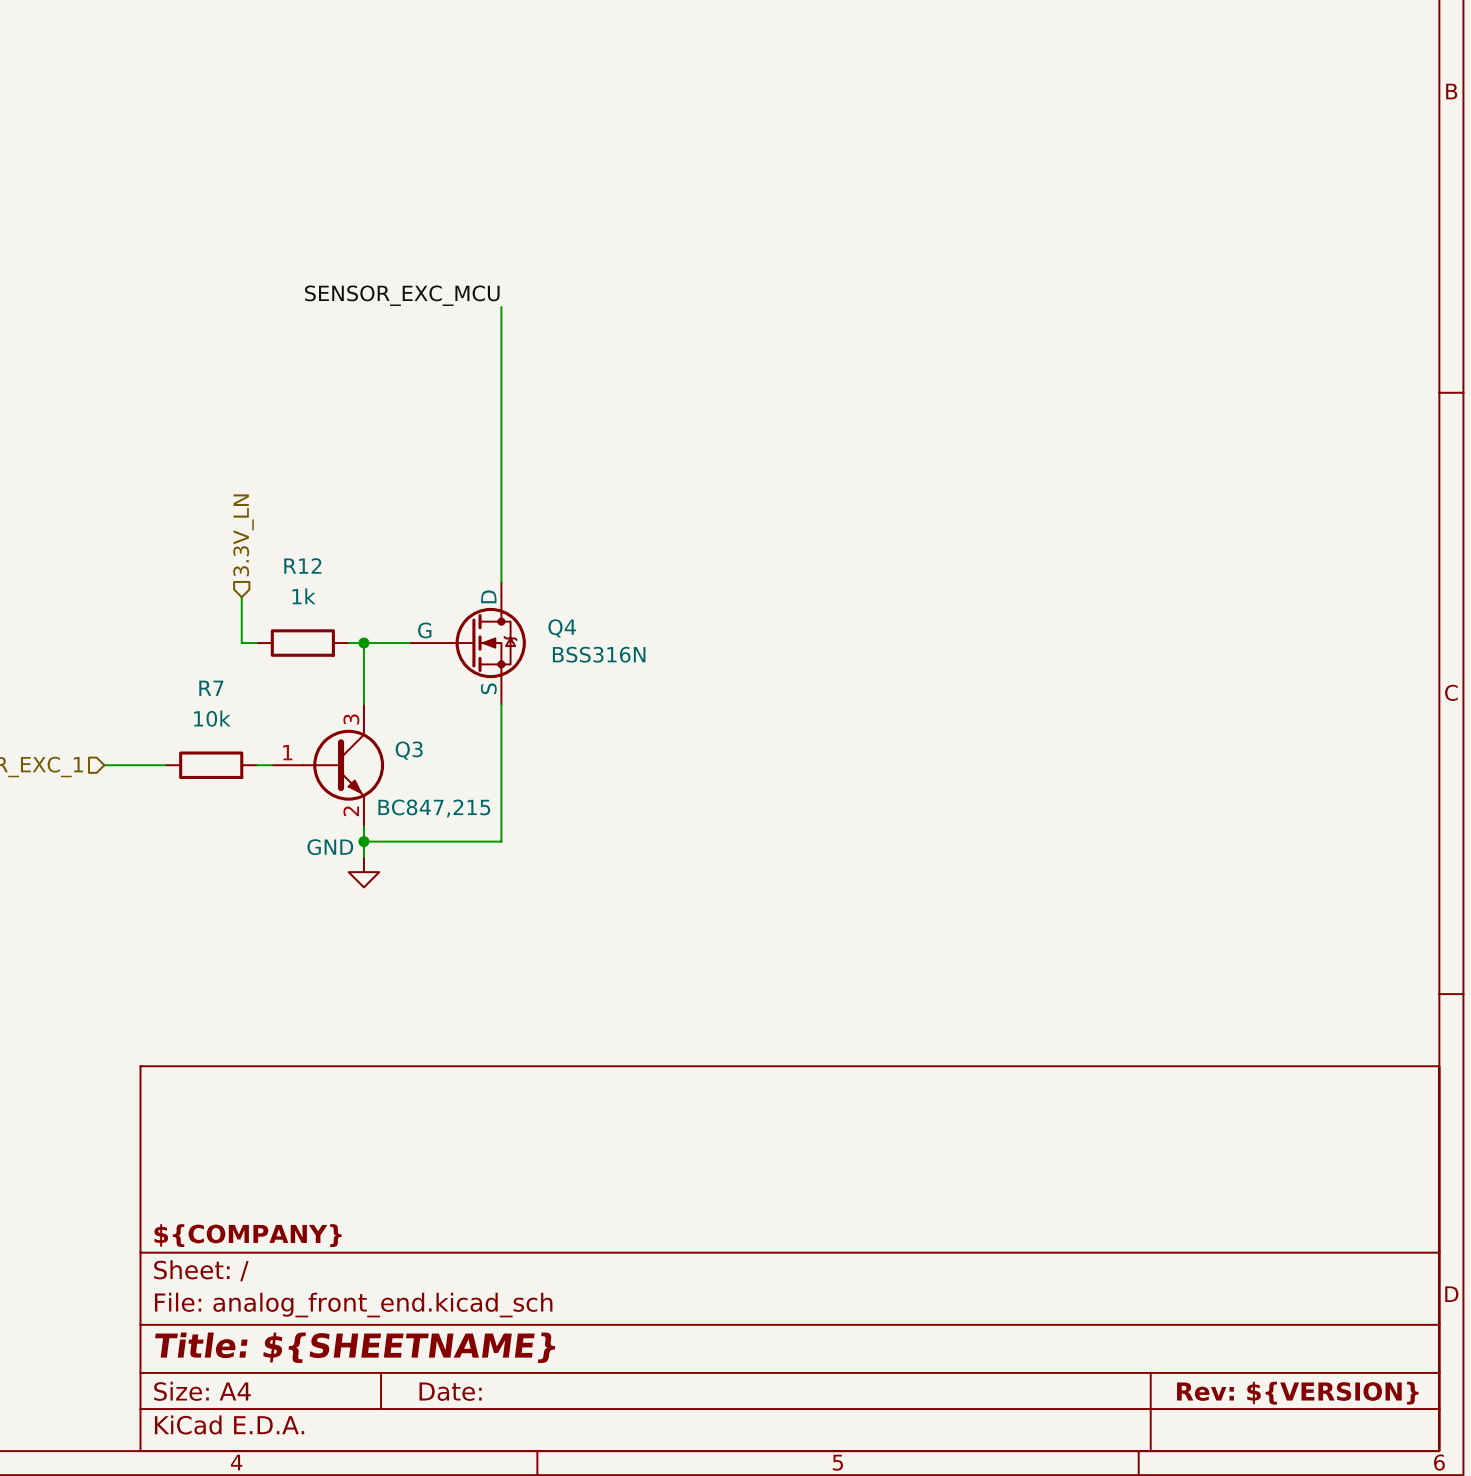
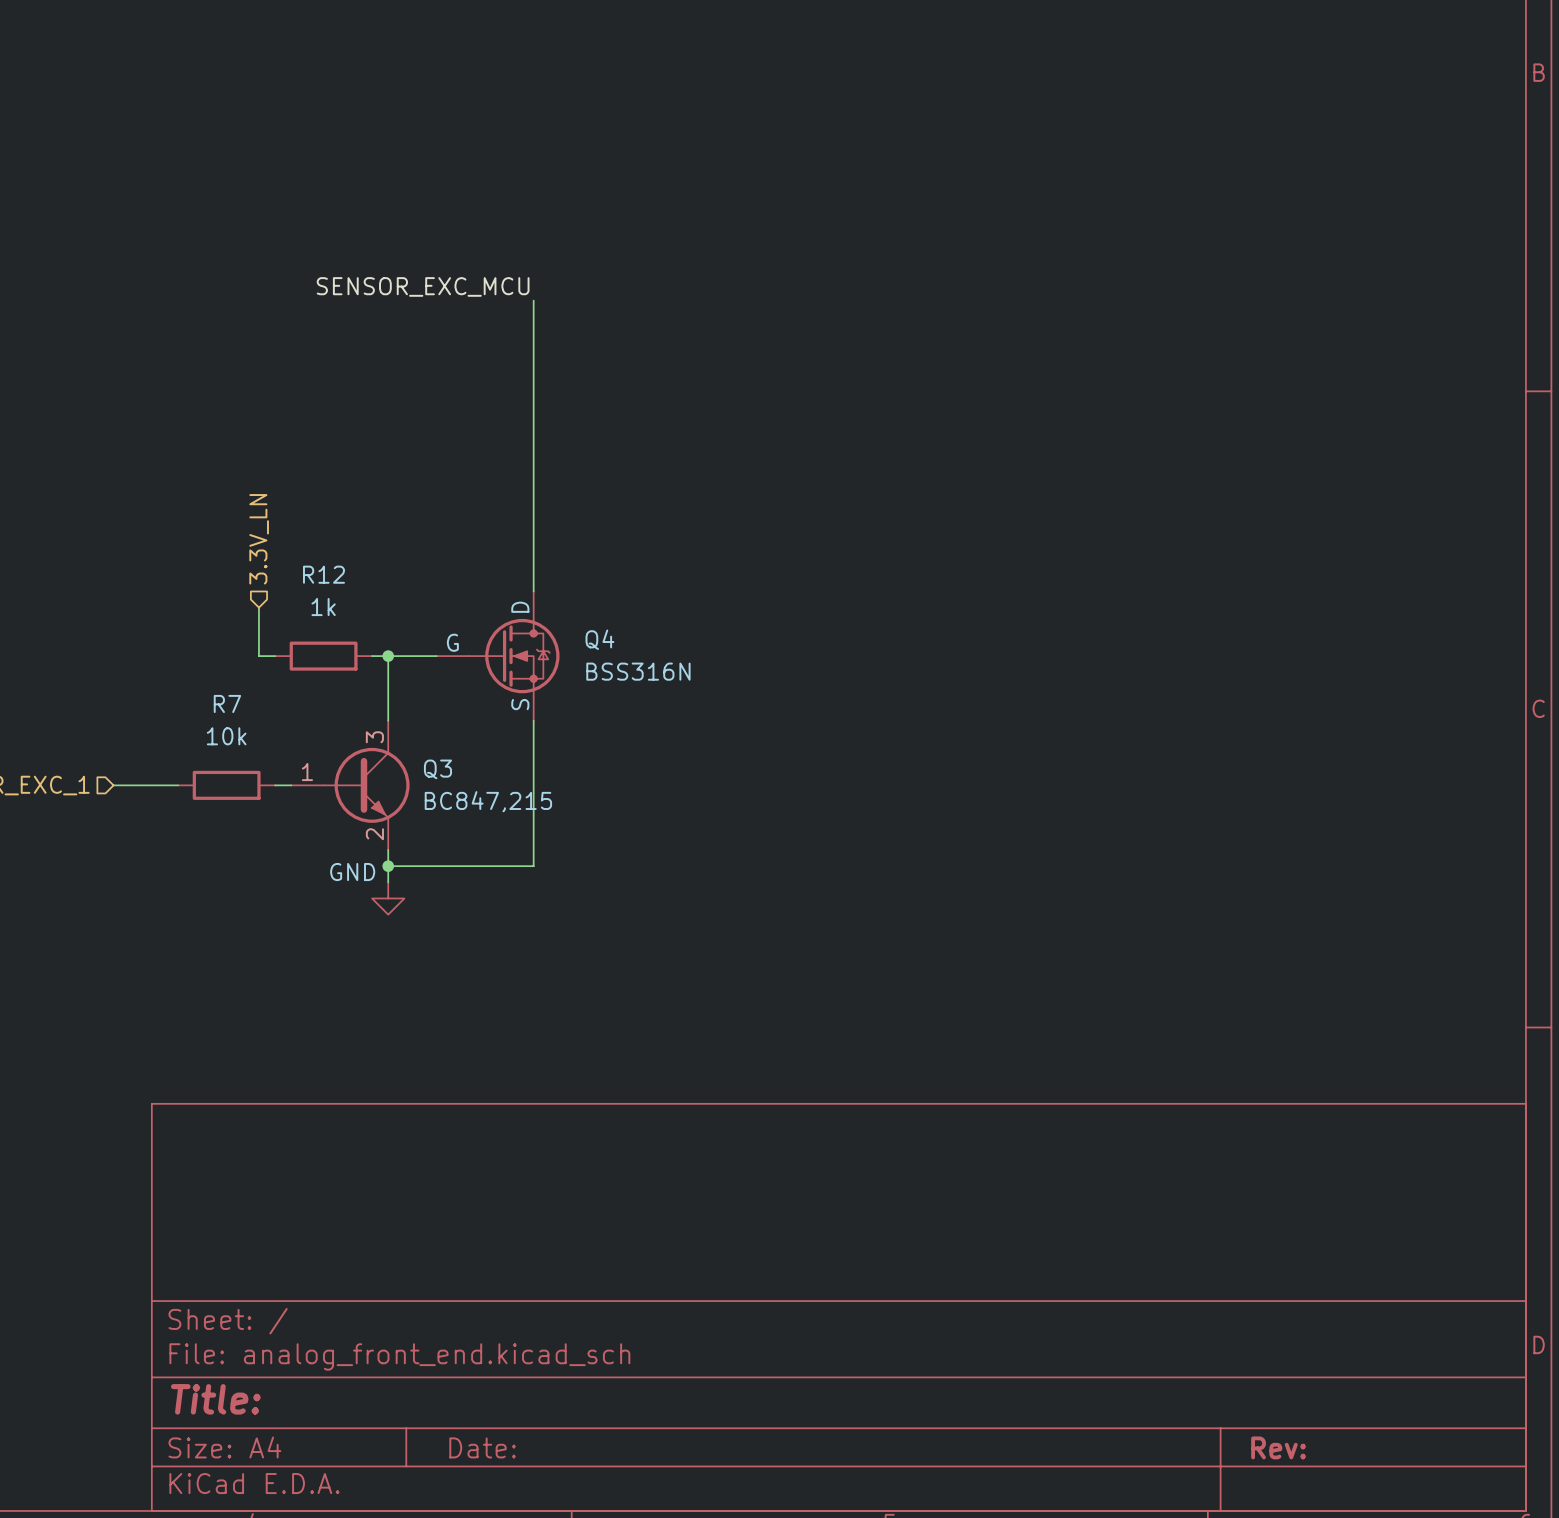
Q4 text: BSS316N (599, 654) -> none
Q4 value: none -> BSS316N (638, 671)
Q3 value: none -> BC847,215 (488, 801)
Q3 text: BC847,215 (434, 808) -> none
title block: ${COMPANY} (248, 1235) -> none
title block: Title: ${SHEETNAME} (355, 1347) -> Title: (215, 1399)
title block: Rev: ${VERSION} (1297, 1393) -> Rev: (1278, 1447)

